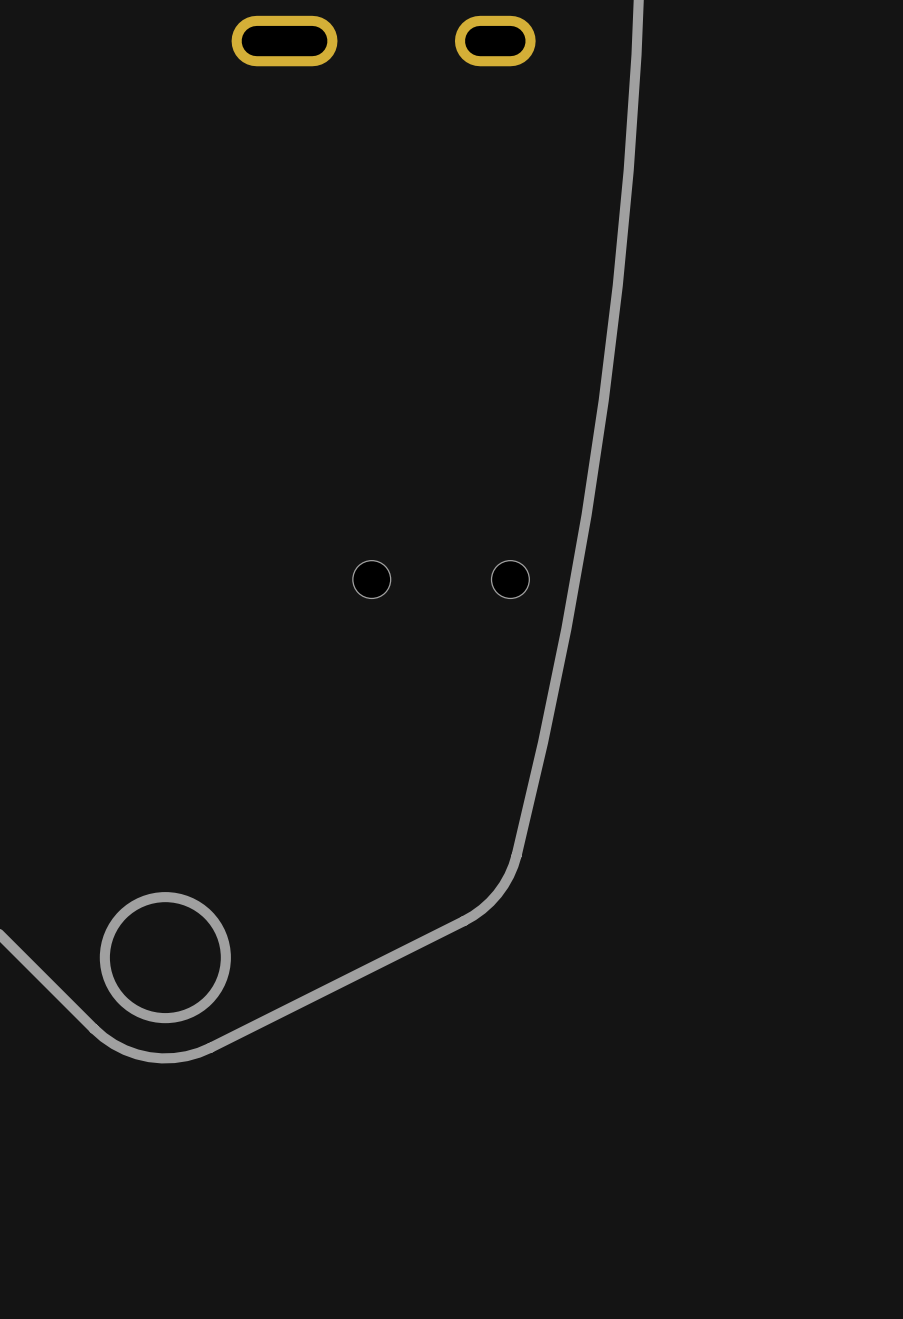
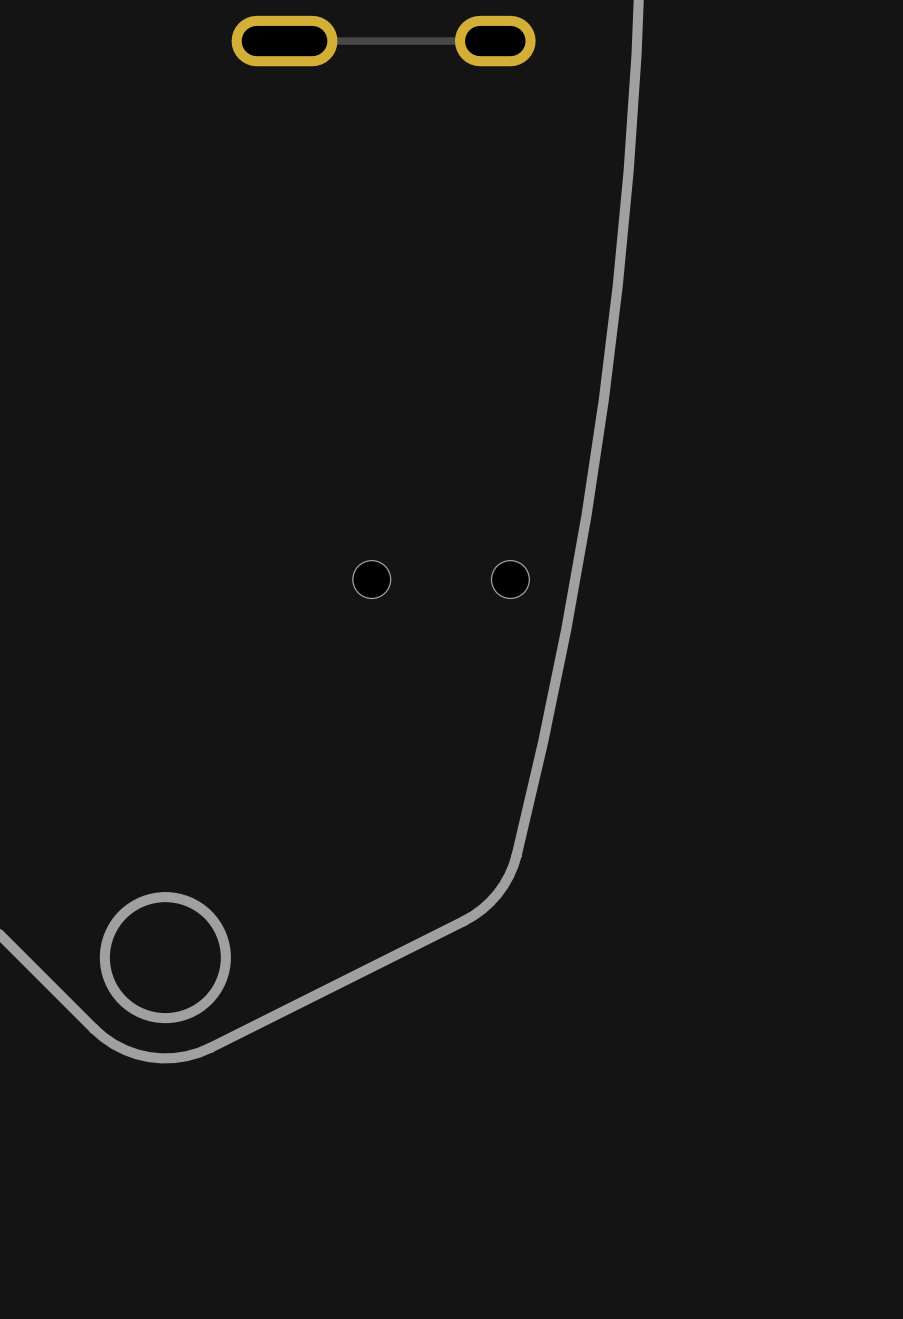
track: none -> (284, 41) (495, 41)

